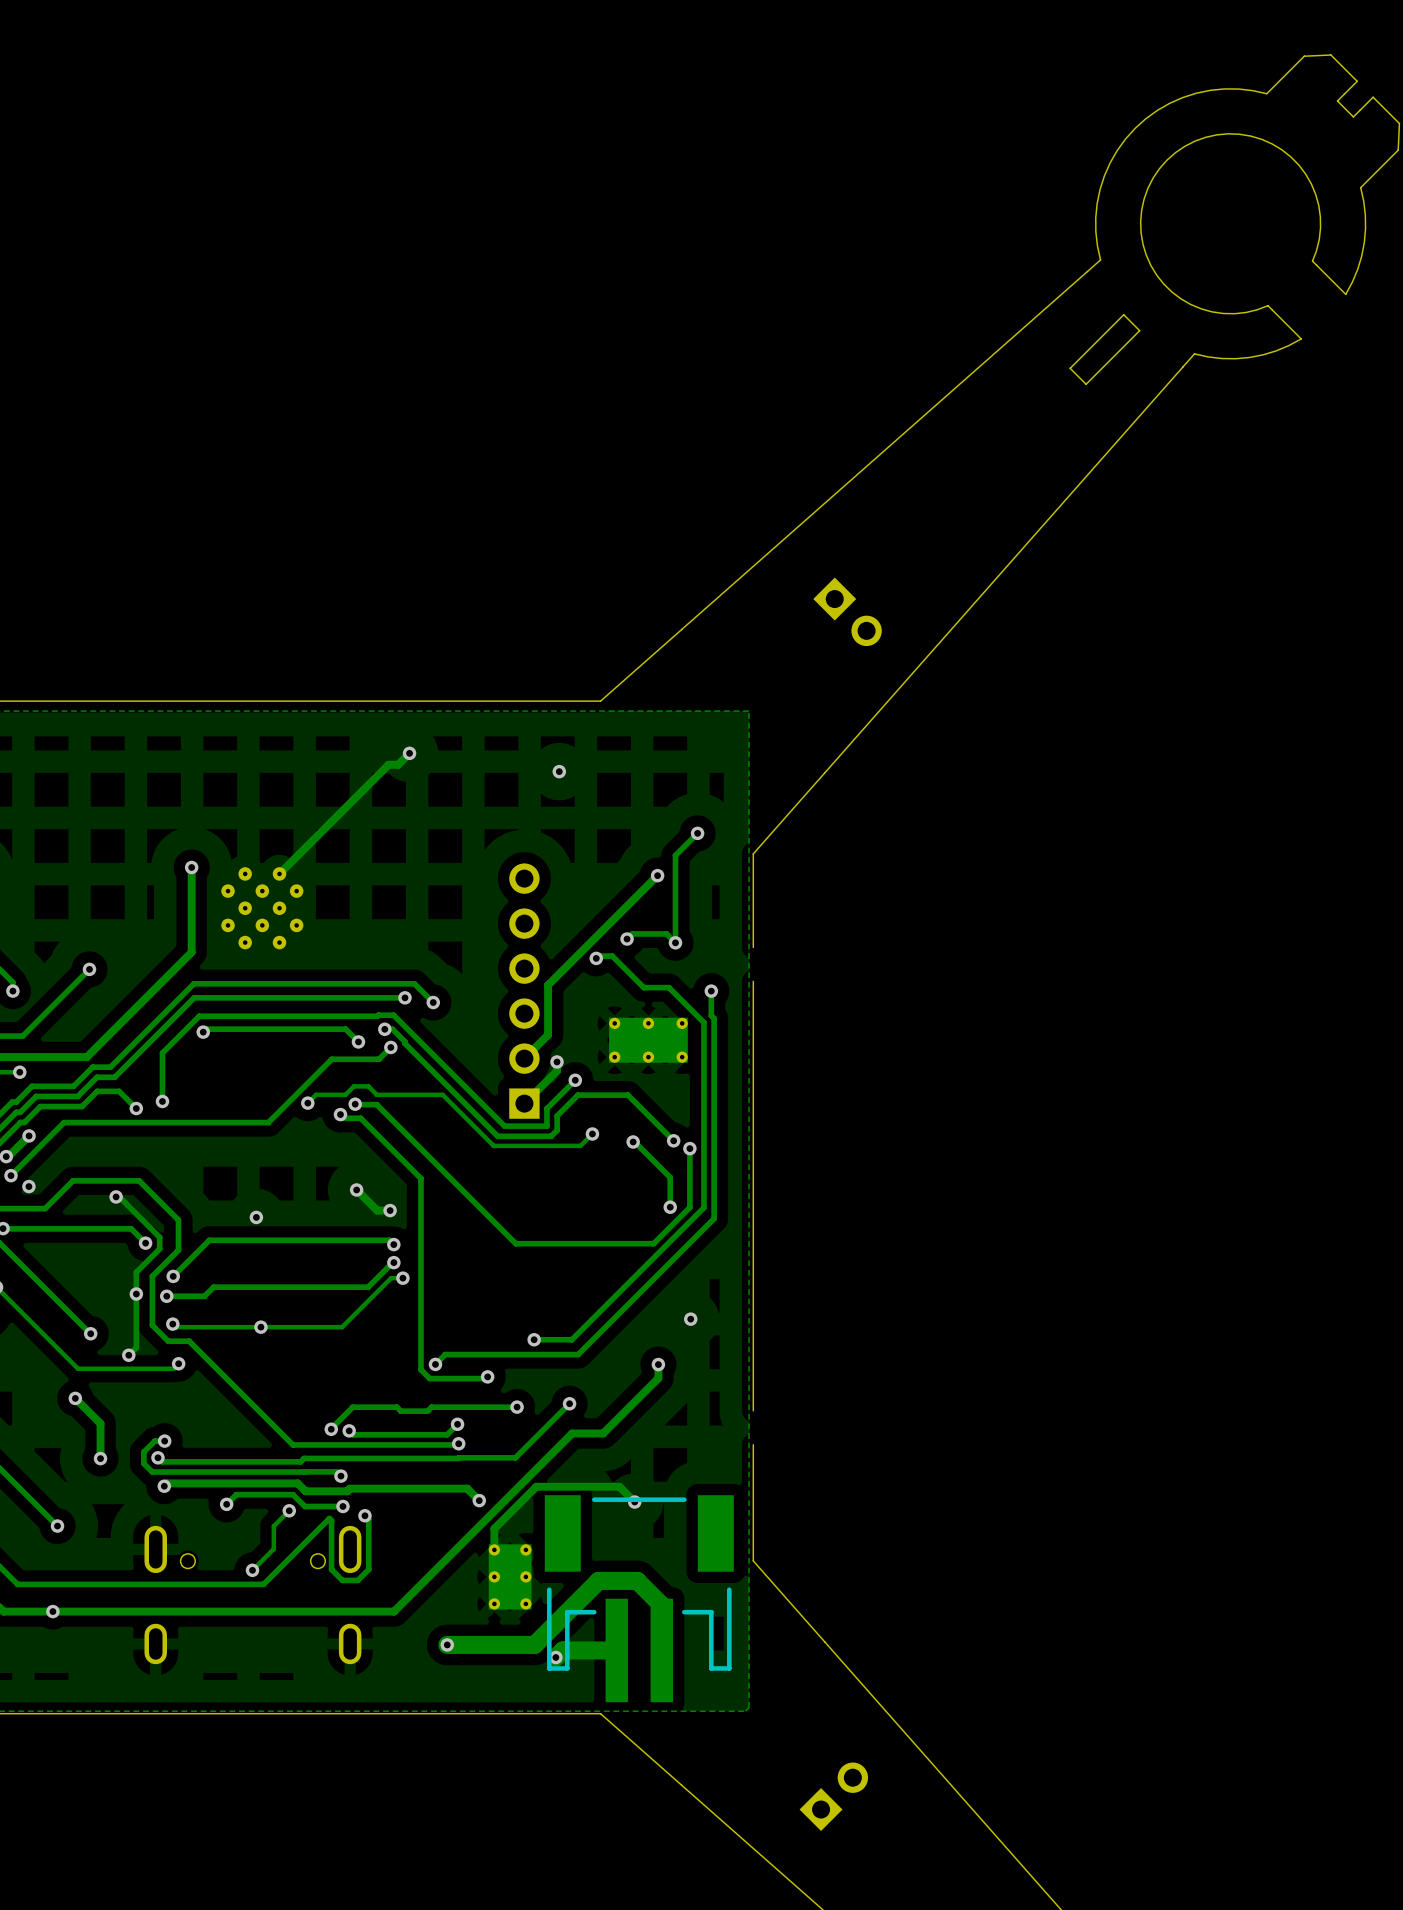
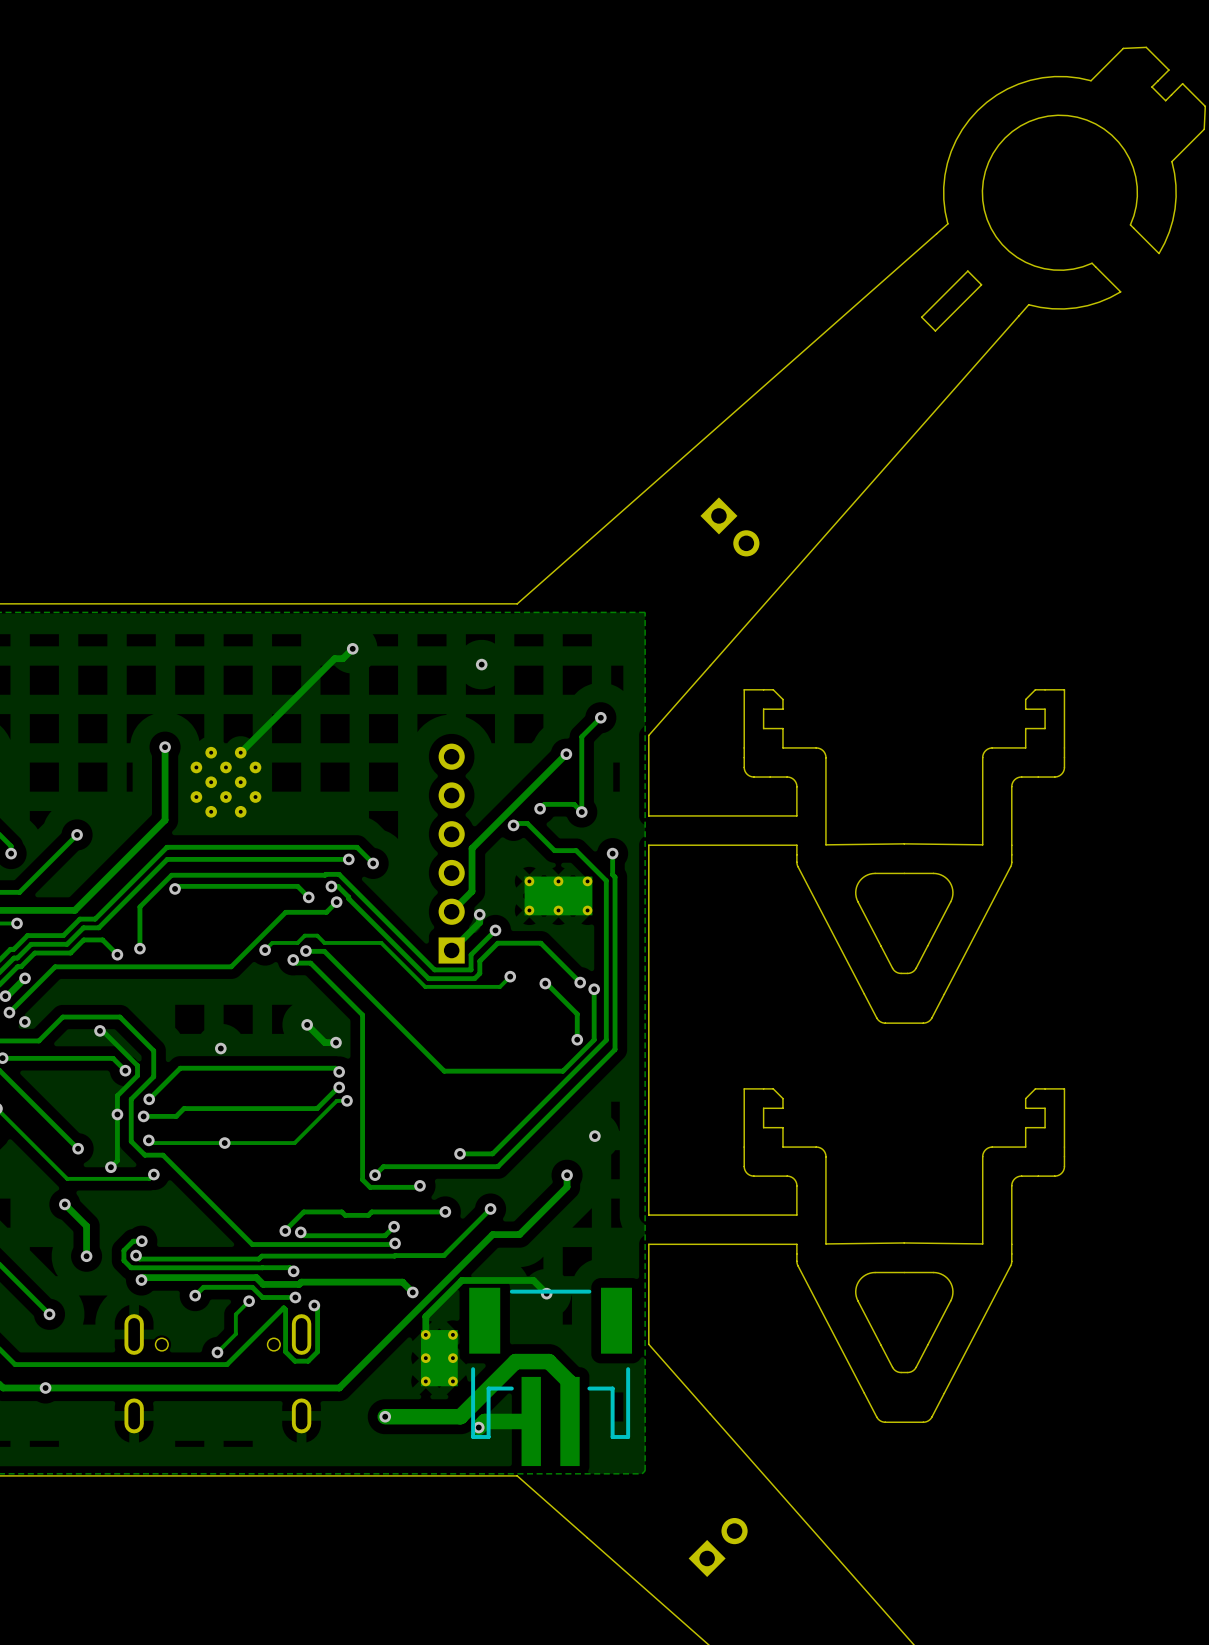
board edge: none -> (648, 815) (796, 815) (796, 785) (793, 779) (788, 777) (751, 776) (746, 773) (744, 768) (744, 689) (773, 689) (782, 699) (782, 709) (763, 709) (763, 728) (782, 728) (782, 747) (817, 748) (822, 750) (825, 754) (825, 844) (982, 844) (983, 752) (991, 748) (1025, 747) (1025, 728) (1045, 728) (1045, 709) (1025, 709) (1025, 699) (1035, 689) (1064, 689) (1063, 771) (1057, 776) (1020, 777) (1012, 782) (1011, 865) (928, 1021) (885, 1023) (877, 1019) (796, 862)
board edge: none -> (648, 845) (796, 845) (796, 862)
board edge: none -> (933, 873) (872, 873) (861, 878) (856, 887) (857, 901) (892, 968) (898, 972) (909, 973) (915, 969) (951, 899) (952, 892) (950, 882) (943, 875) (933, 873)
board edge: none -> (648, 1215) (796, 1215) (796, 1184) (793, 1178) (788, 1176) (751, 1175) (746, 1172) (744, 1167) (744, 1088) (773, 1088) (782, 1098) (782, 1108) (763, 1108) (763, 1127) (782, 1127) (782, 1147) (817, 1147) (822, 1149) (825, 1153) (825, 1243) (982, 1243) (983, 1151) (991, 1147) (1025, 1147) (1025, 1127) (1045, 1127) (1045, 1108) (1025, 1108) (1025, 1098) (1035, 1088) (1064, 1088) (1063, 1170) (1057, 1175) (1020, 1176) (1012, 1181) (1011, 1264) (931, 1417) (926, 1421) (884, 1422) (877, 1417) (797, 1265) (796, 1244) (648, 1244)
board edge: none -> (933, 1272) (872, 1272) (863, 1276) (856, 1286) (857, 1300) (892, 1367) (898, 1372) (909, 1372) (915, 1368) (951, 1298) (952, 1288) (948, 1279) (940, 1273) (933, 1272)

